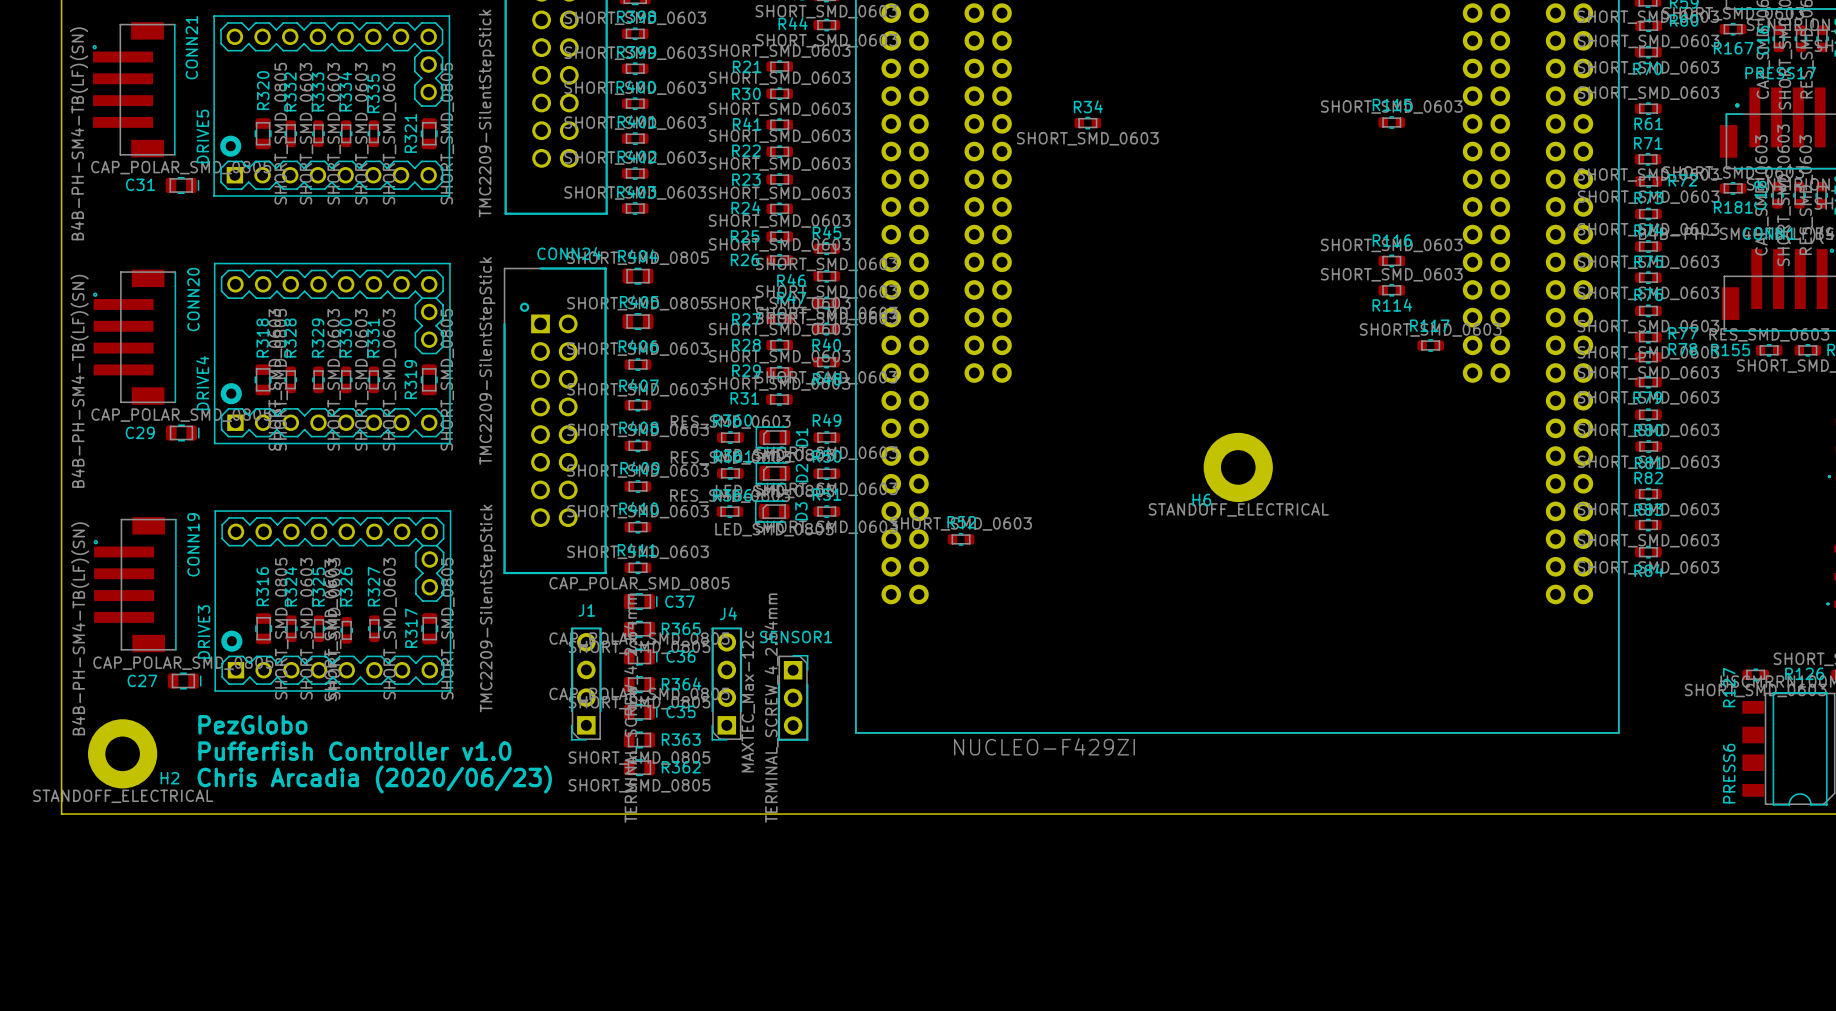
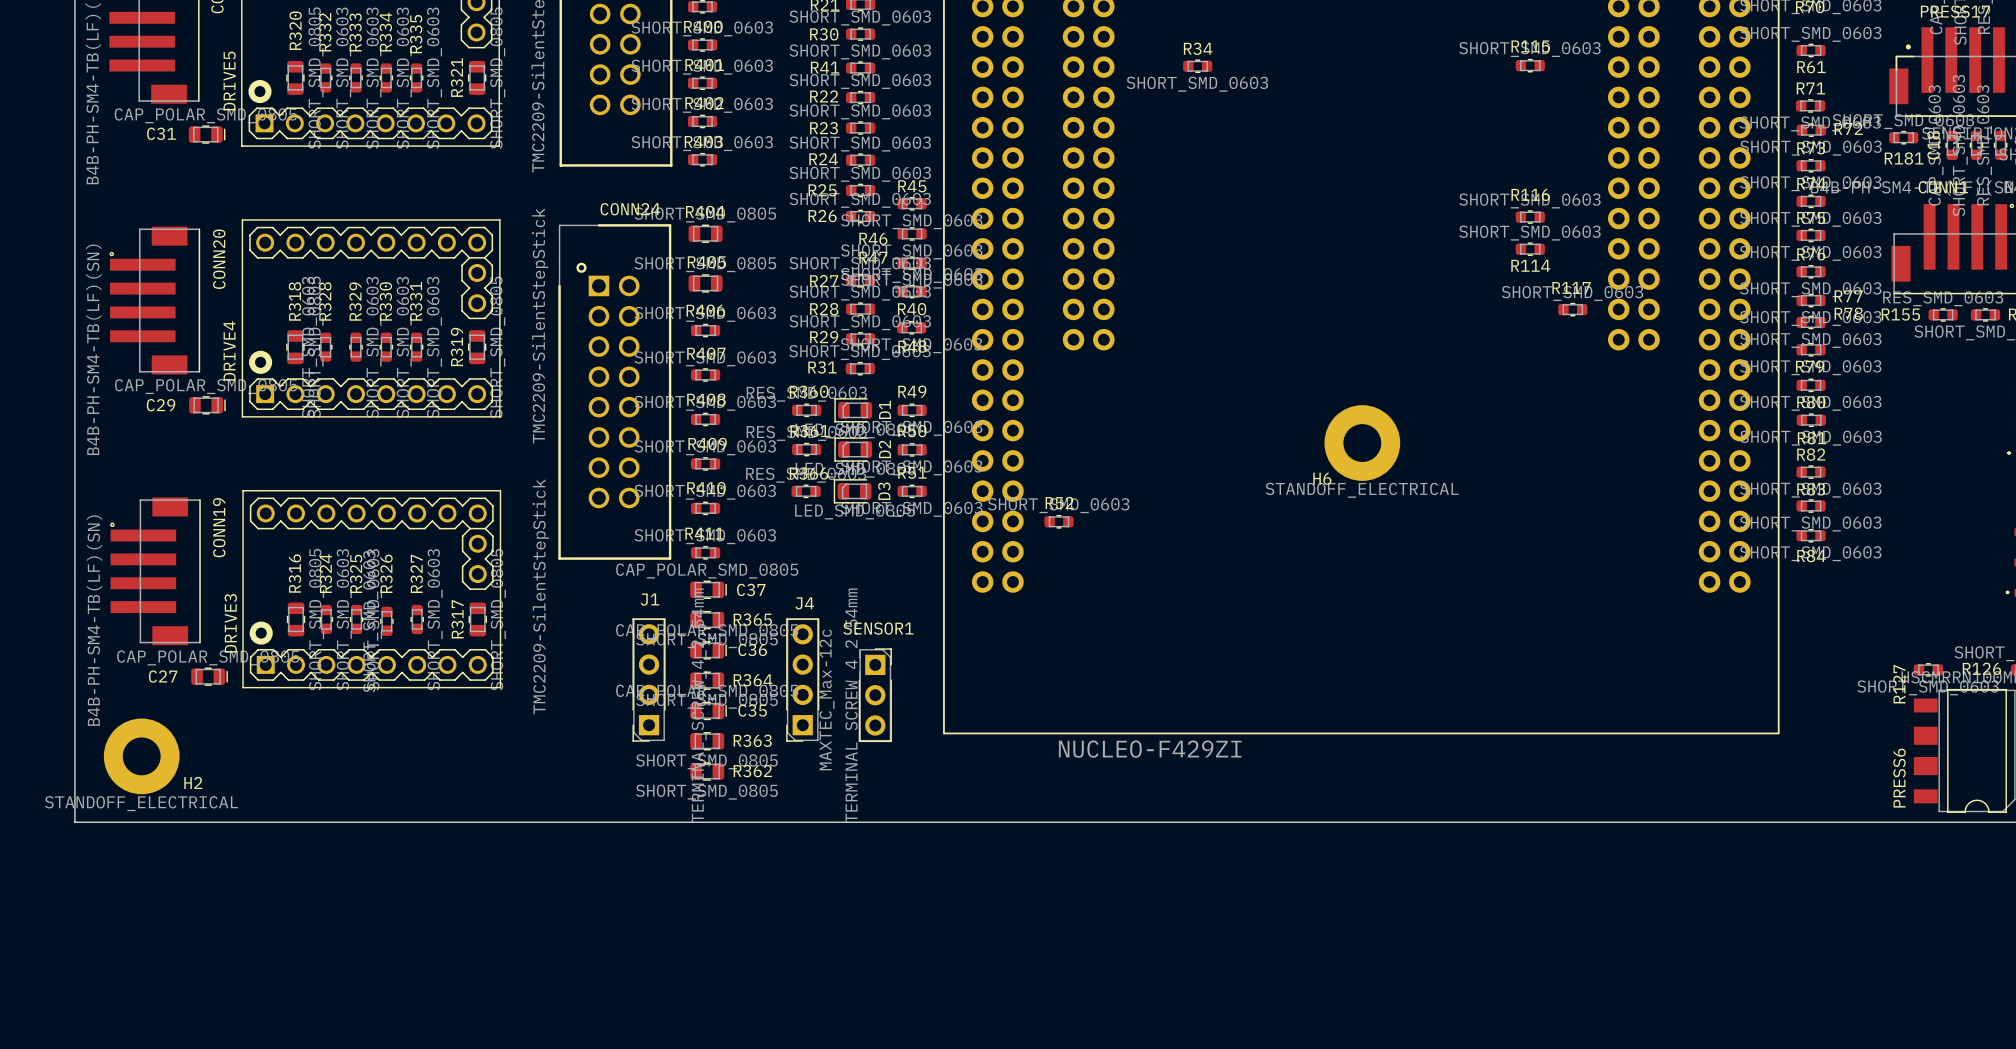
text: PezGlobo (252, 724) -> none
text: Pufferfish Controller v1.0 (354, 751) -> none
text: Chris Arcadia (2020/06/23) (374, 779) -> none

